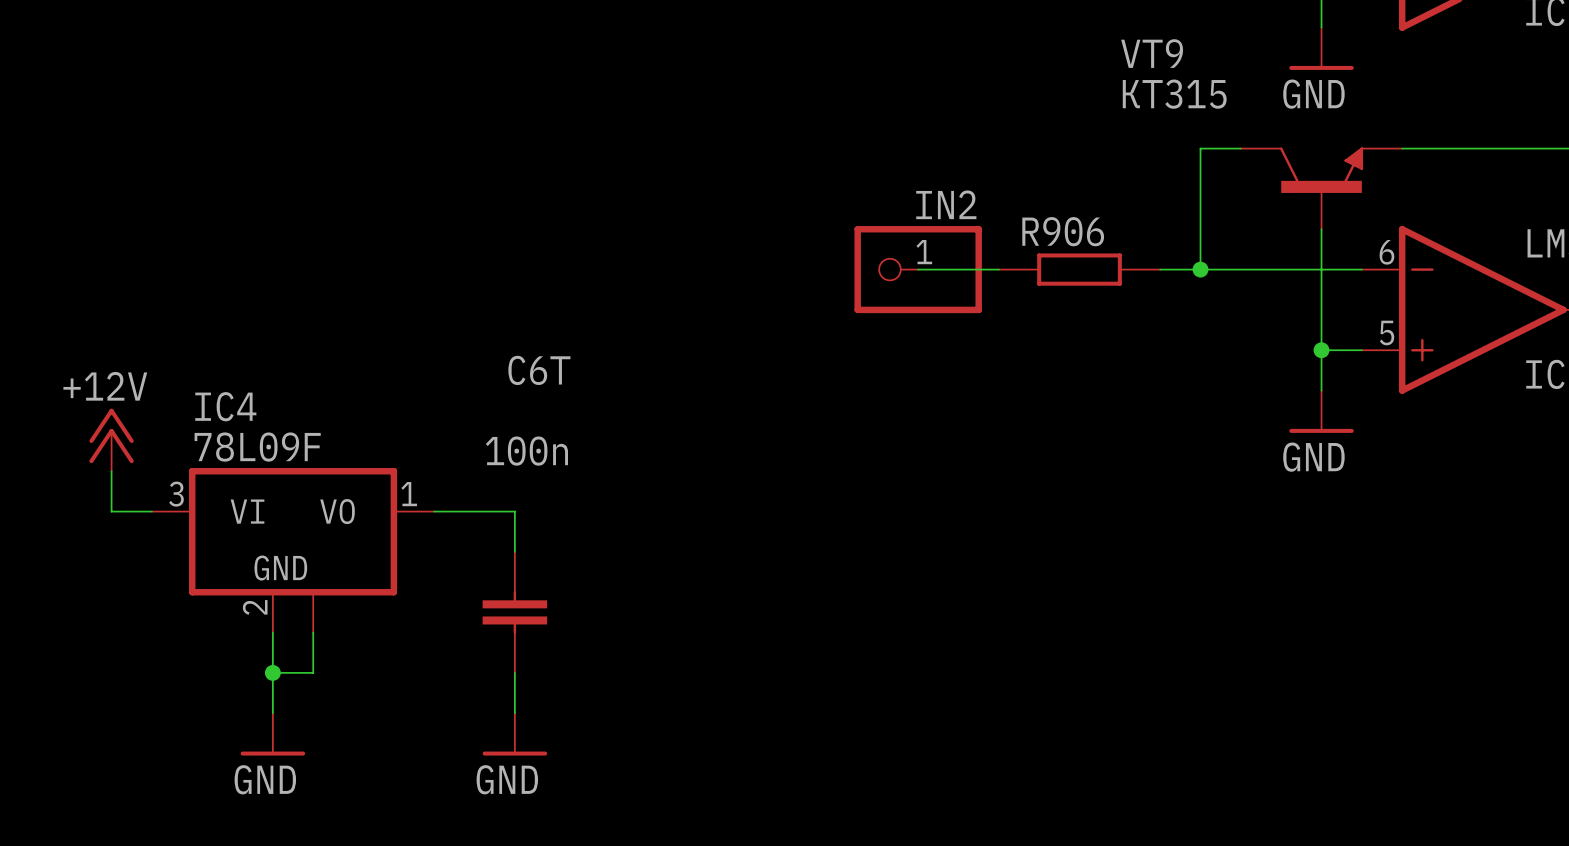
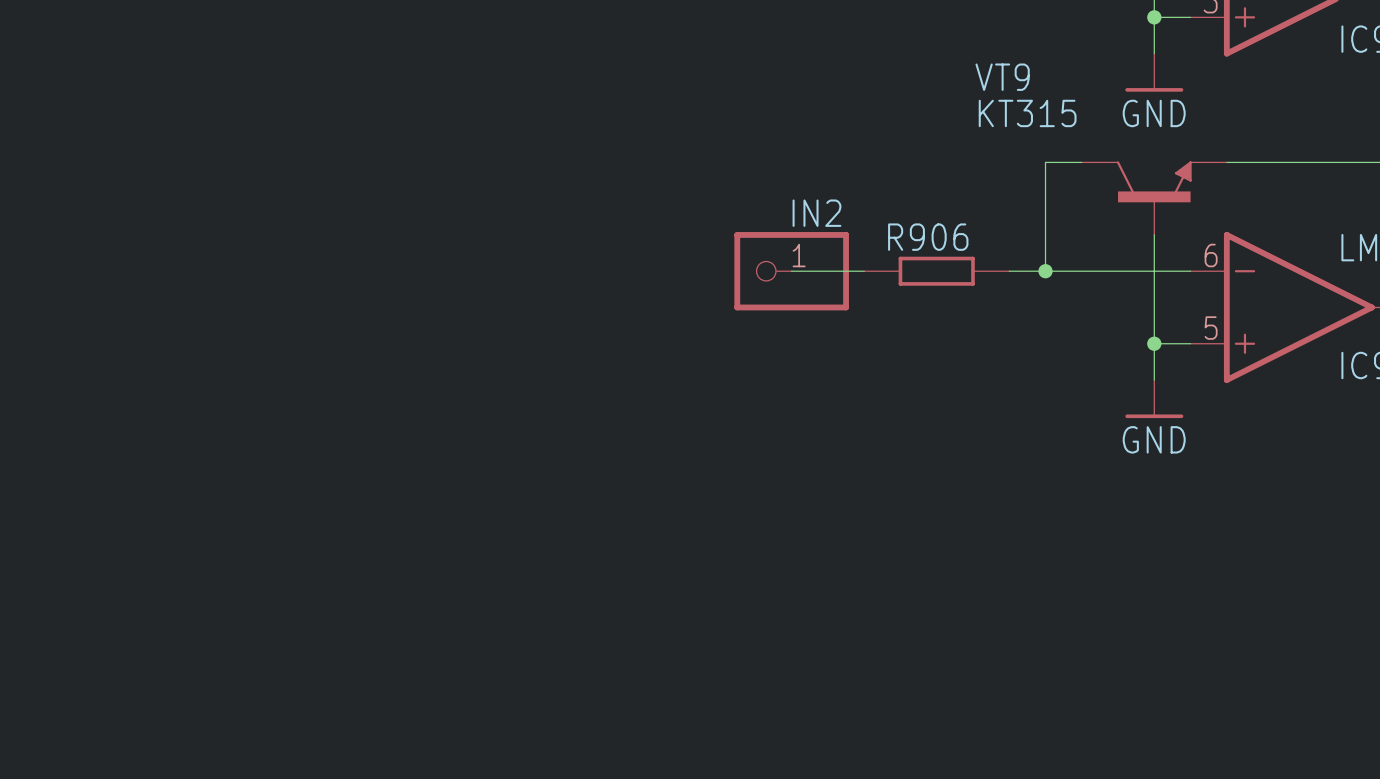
power symbol: +12V (111, 439) -> none
wire: (111, 471) (111, 511) (151, 511) -> none
wire: (434, 511) (514, 511) (514, 551) -> none
IC4: 78L09F (293, 550) -> none
C6T: 100n (514, 612) -> none
wire: (272, 632) (272, 713) -> none
wire: (313, 632) (313, 672) (272, 672) -> none
junction: (272, 672) -> none
wire: (514, 672) (514, 713) -> none
power symbol: GND (272, 734) -> none
power symbol: GND (514, 734) -> none

